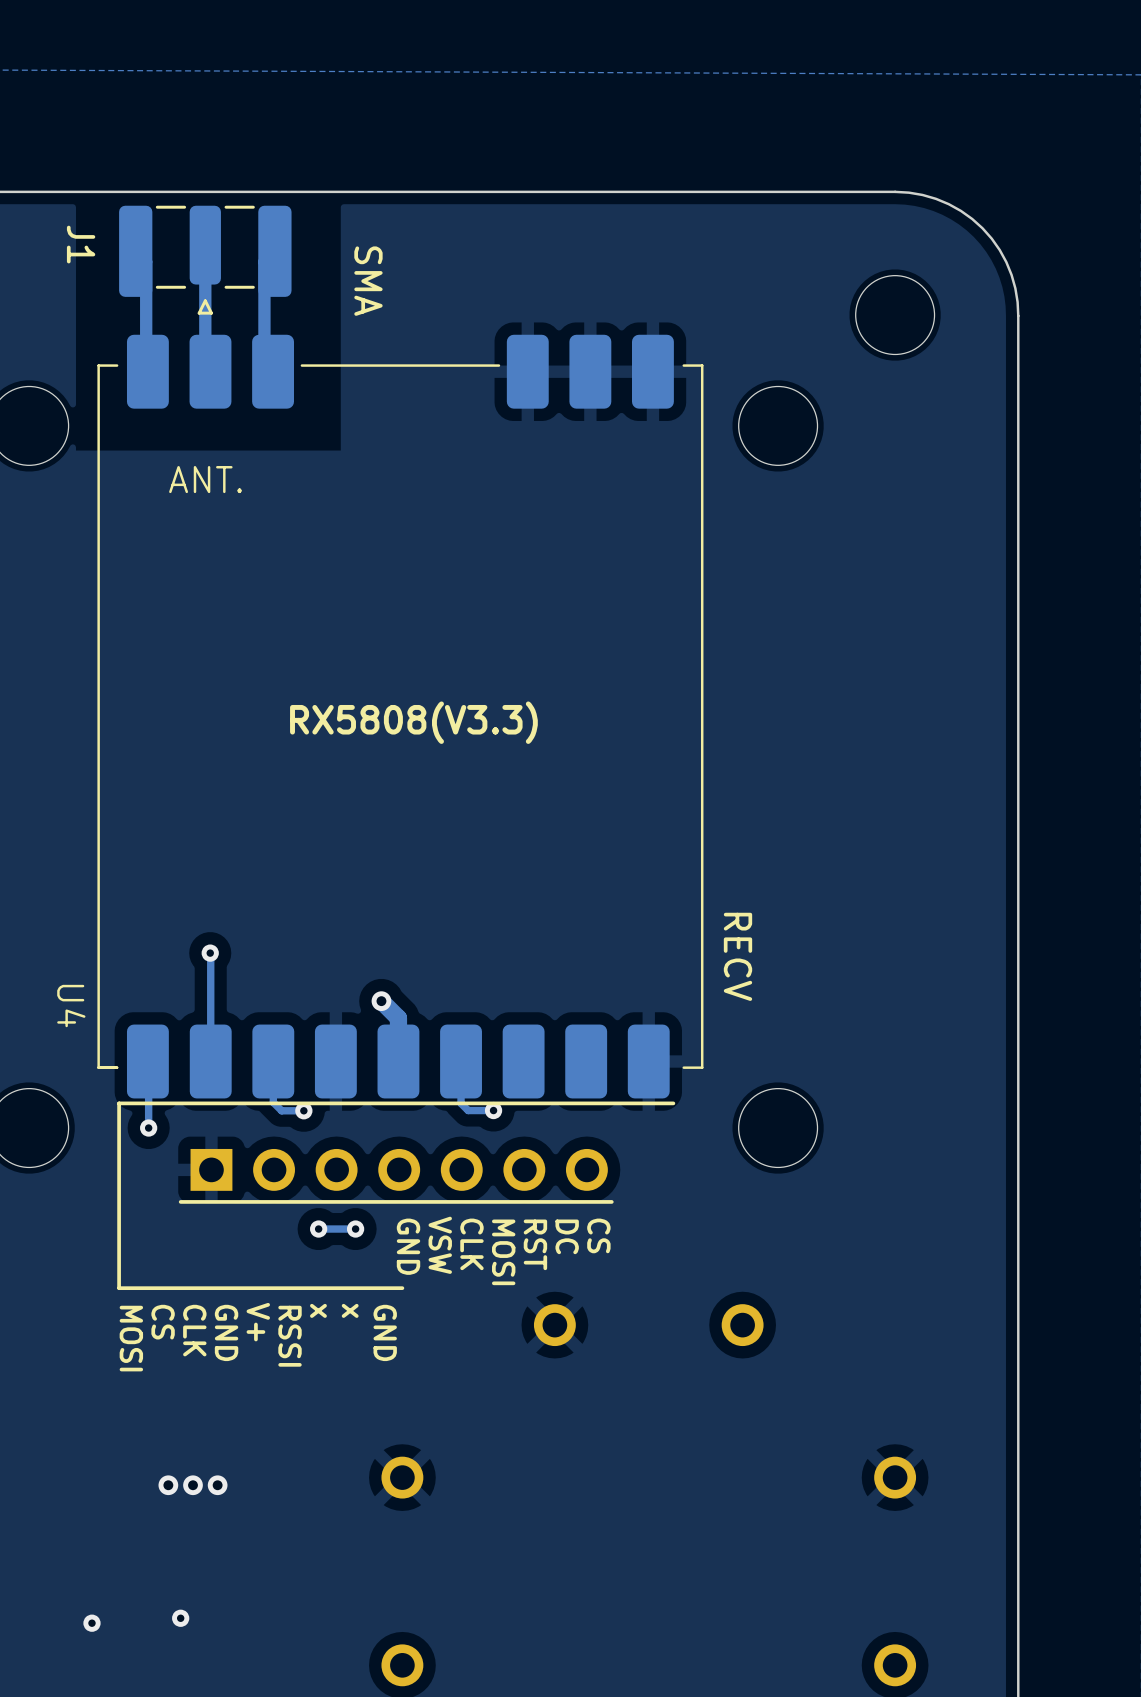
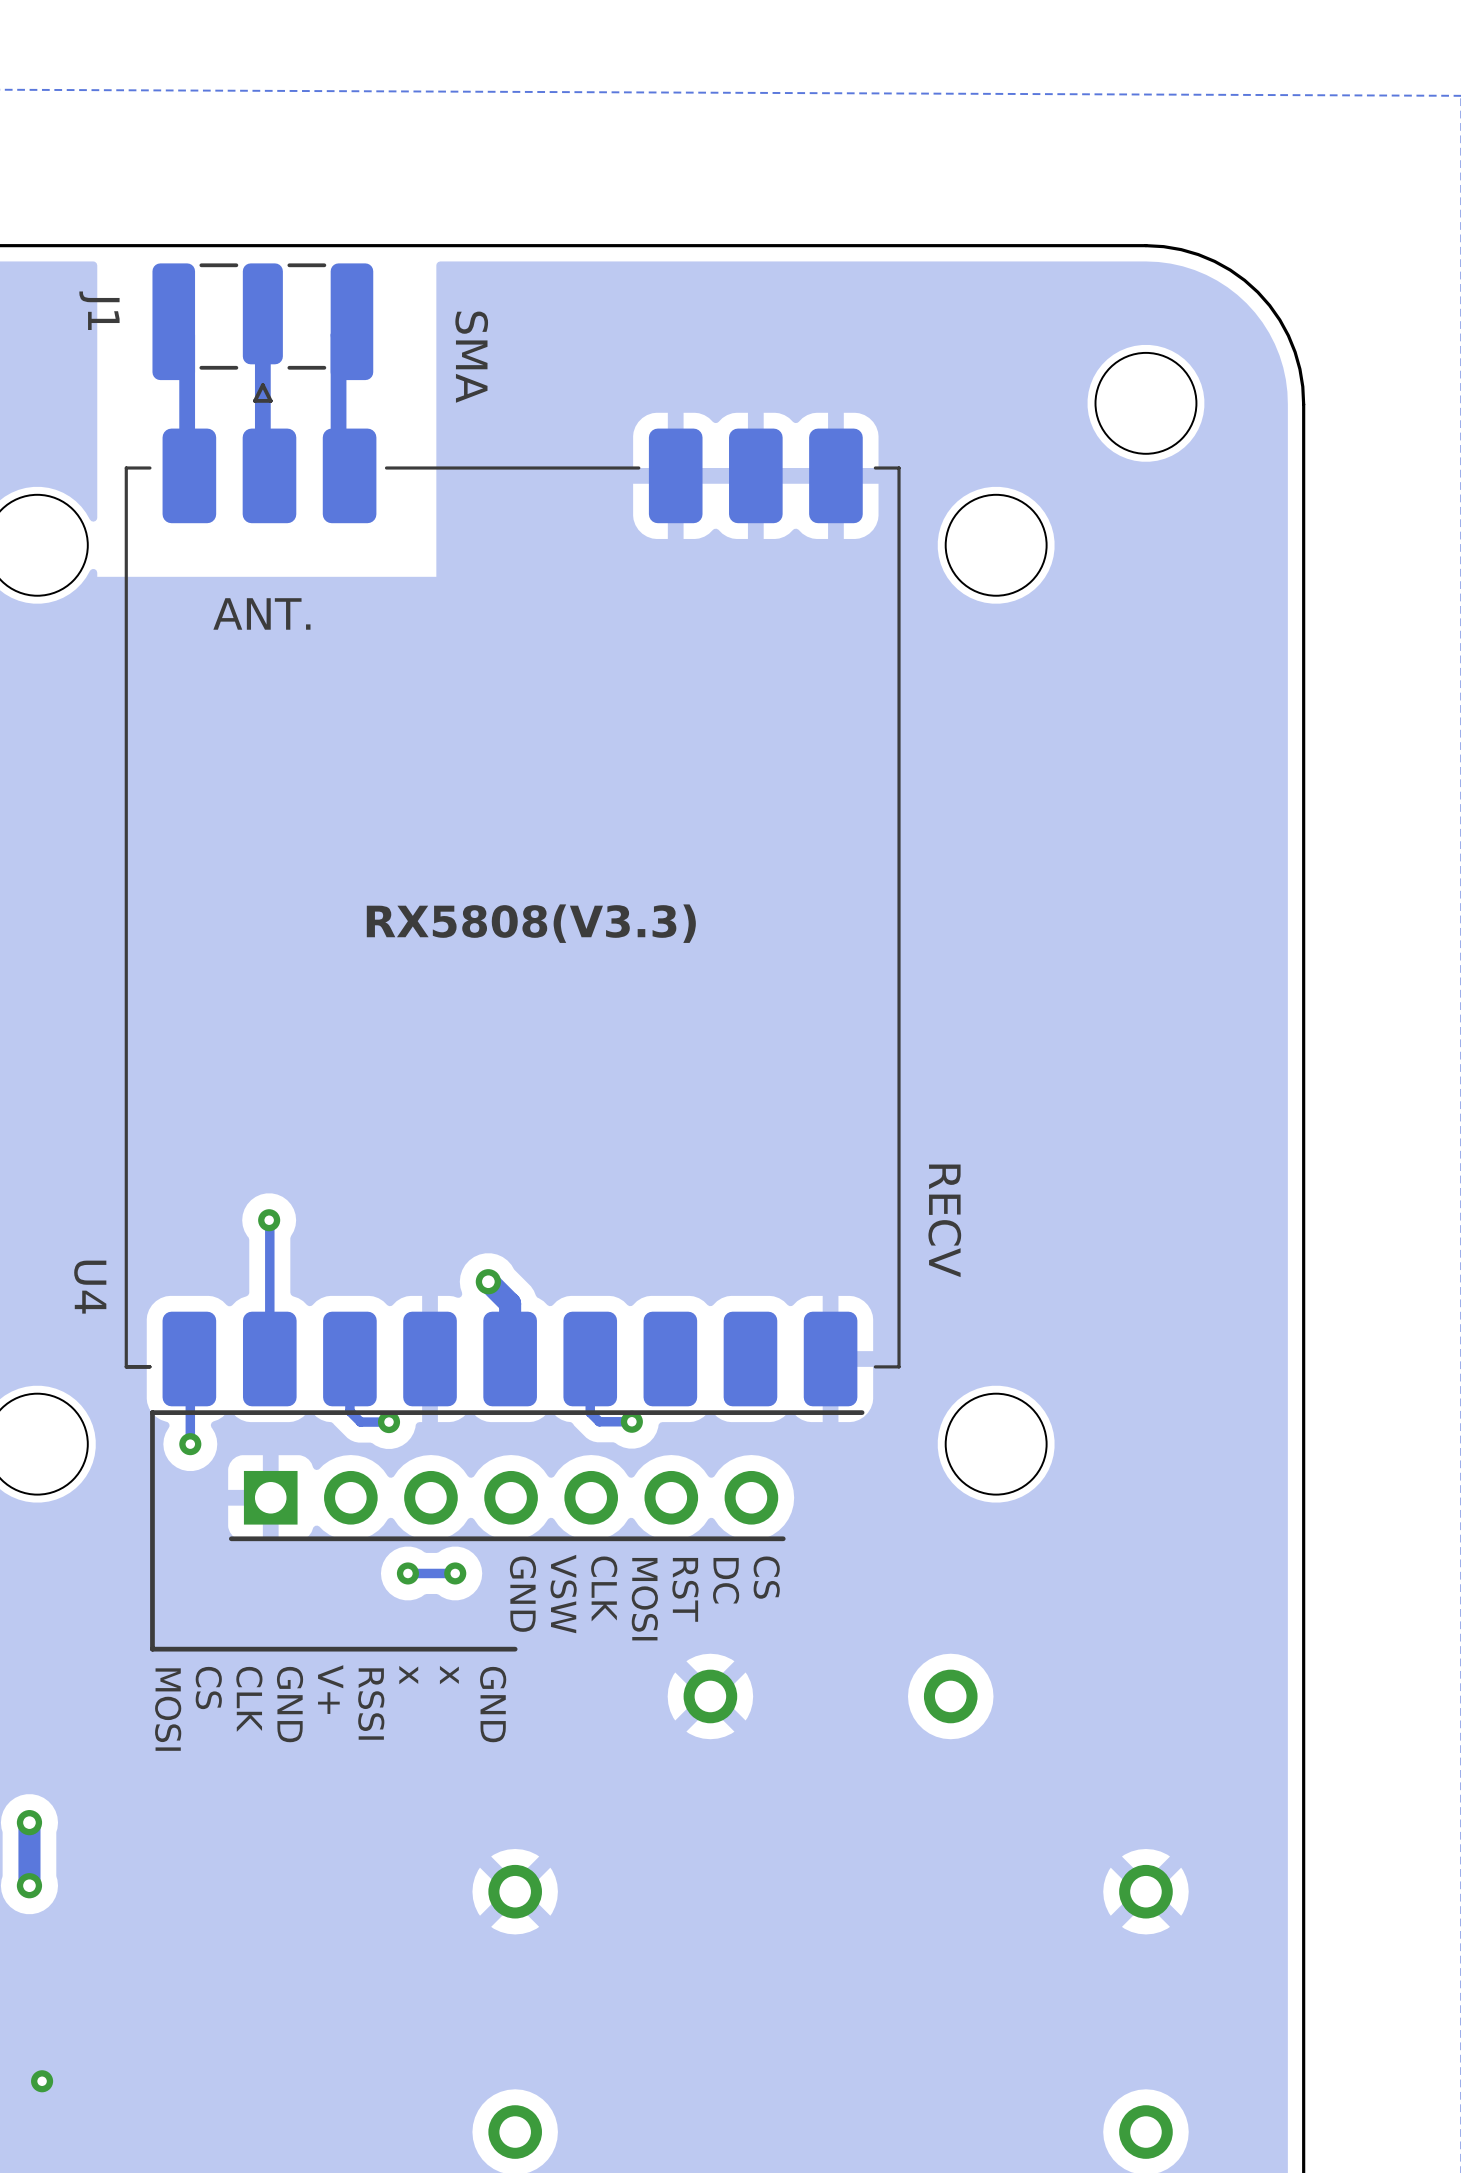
track: none -> (29, 1822) (29, 1885)
via: none -> (29, 1822)
via: none -> (29, 1885)
via: (168, 1485) -> none
via: (193, 1485) -> none
via: (217, 1485) -> none
via: (180, 1618) -> none
via position: (91, 1623) -> (42, 2081)

